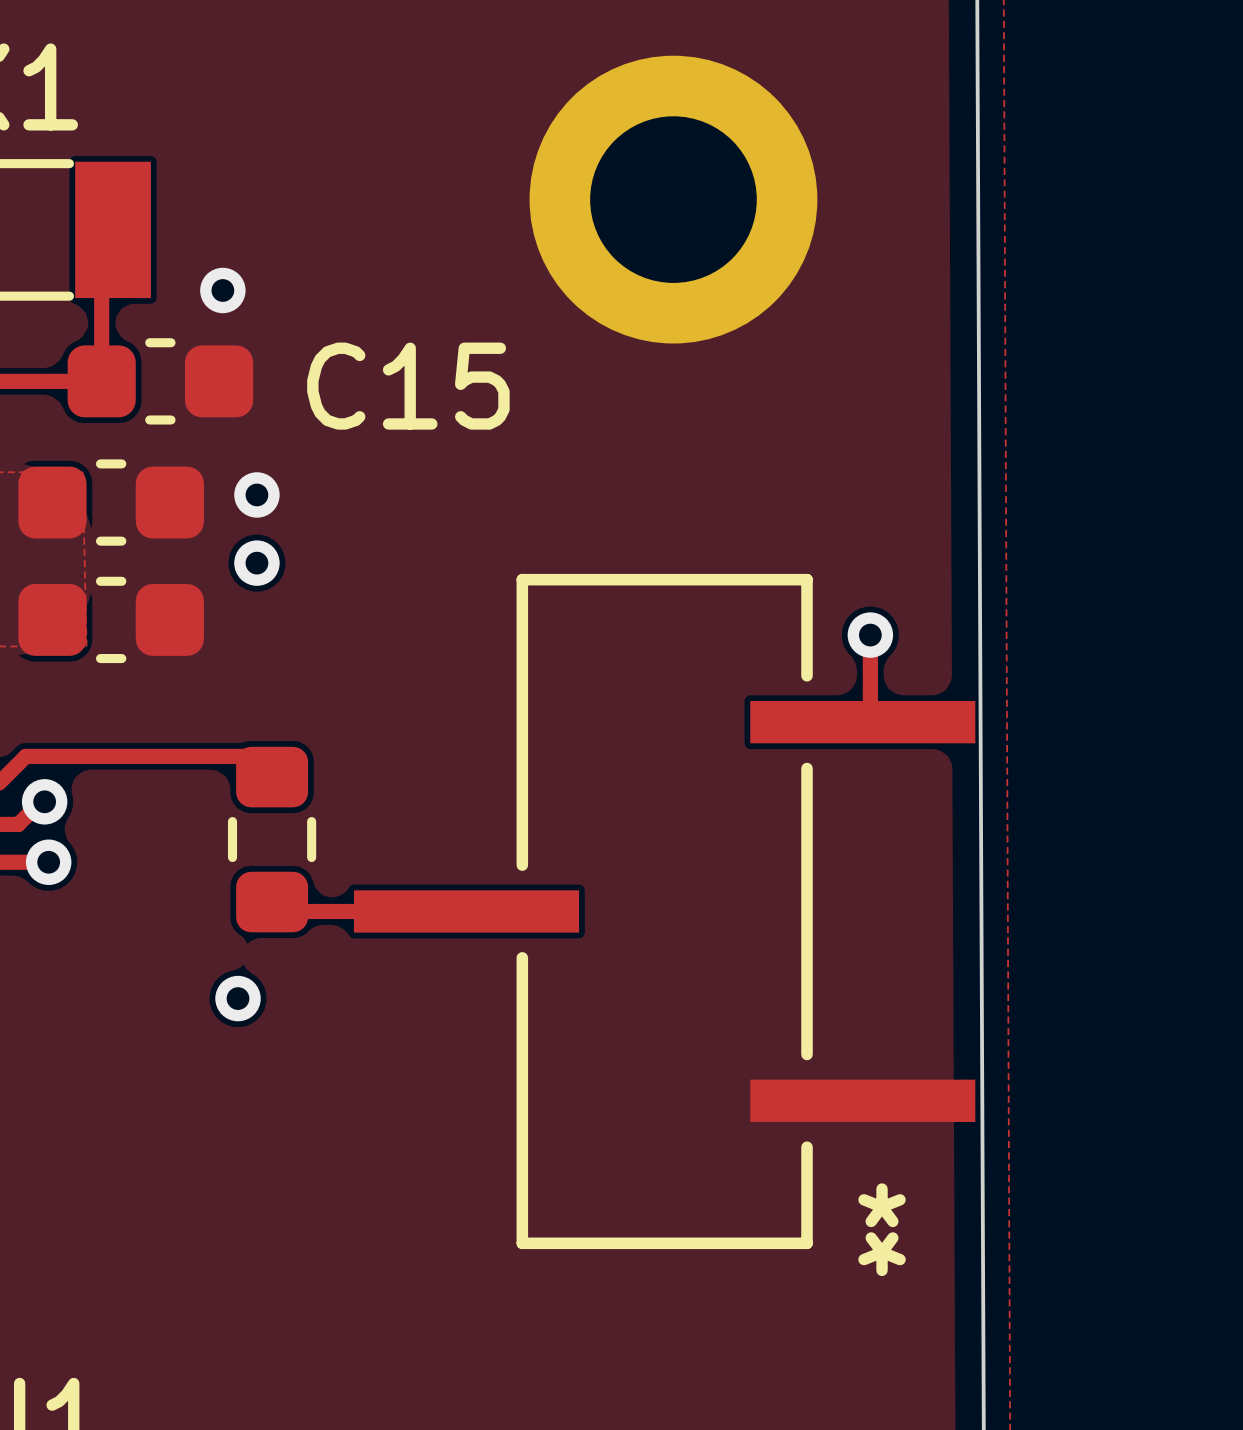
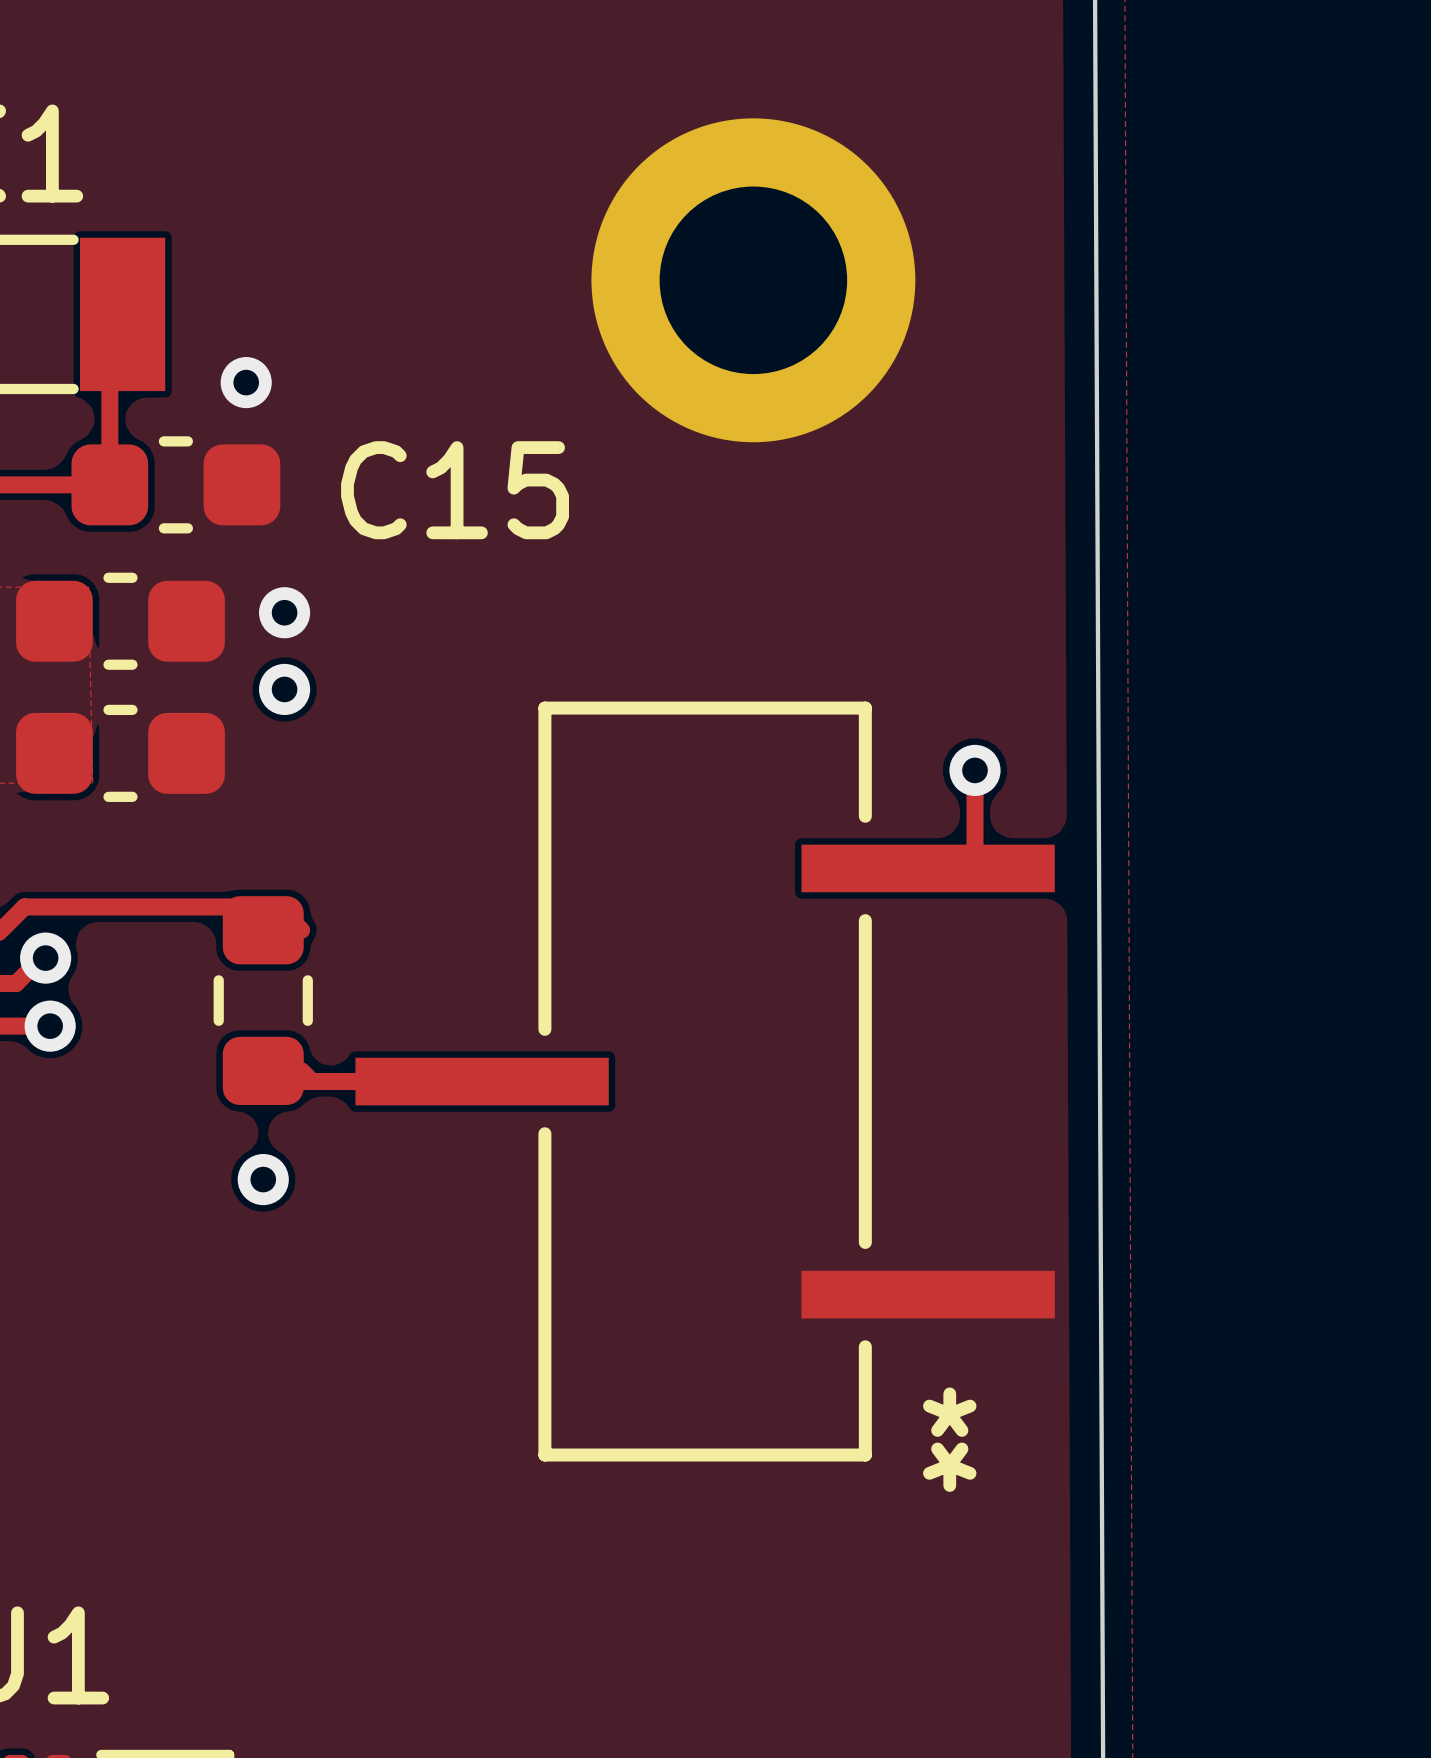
part position: (272, 839) -> (263, 1000)
part position: (664, 911) -> (705, 1081)

